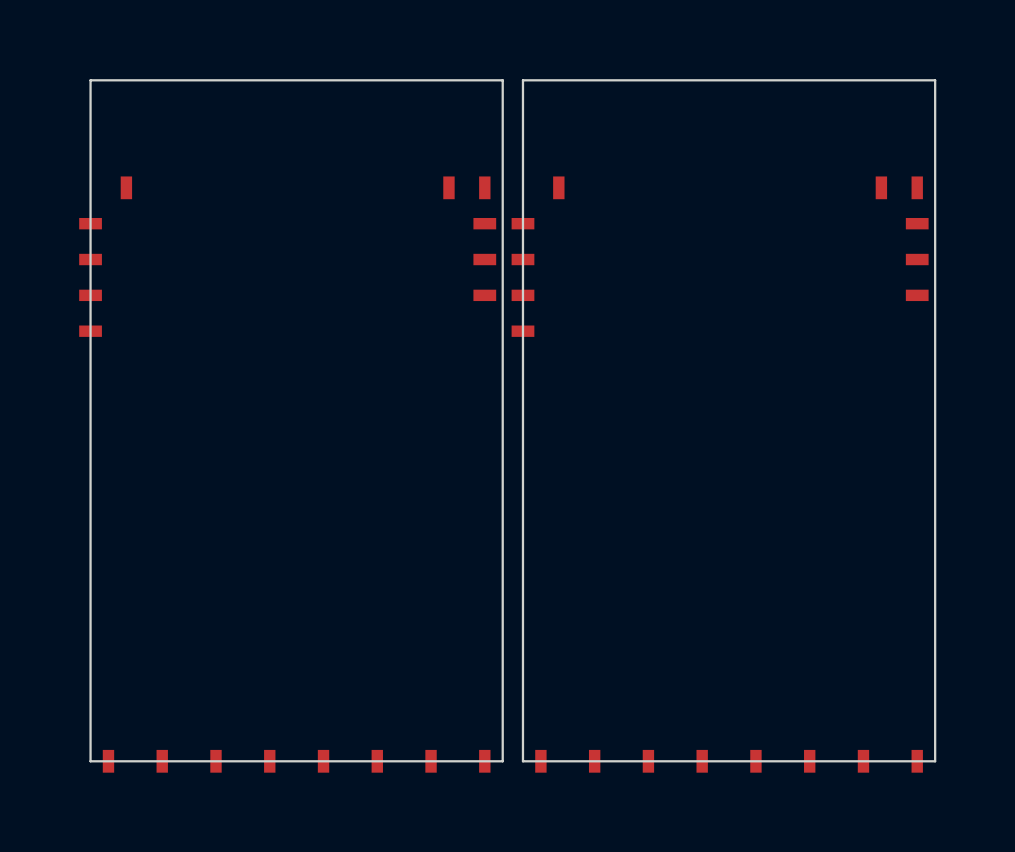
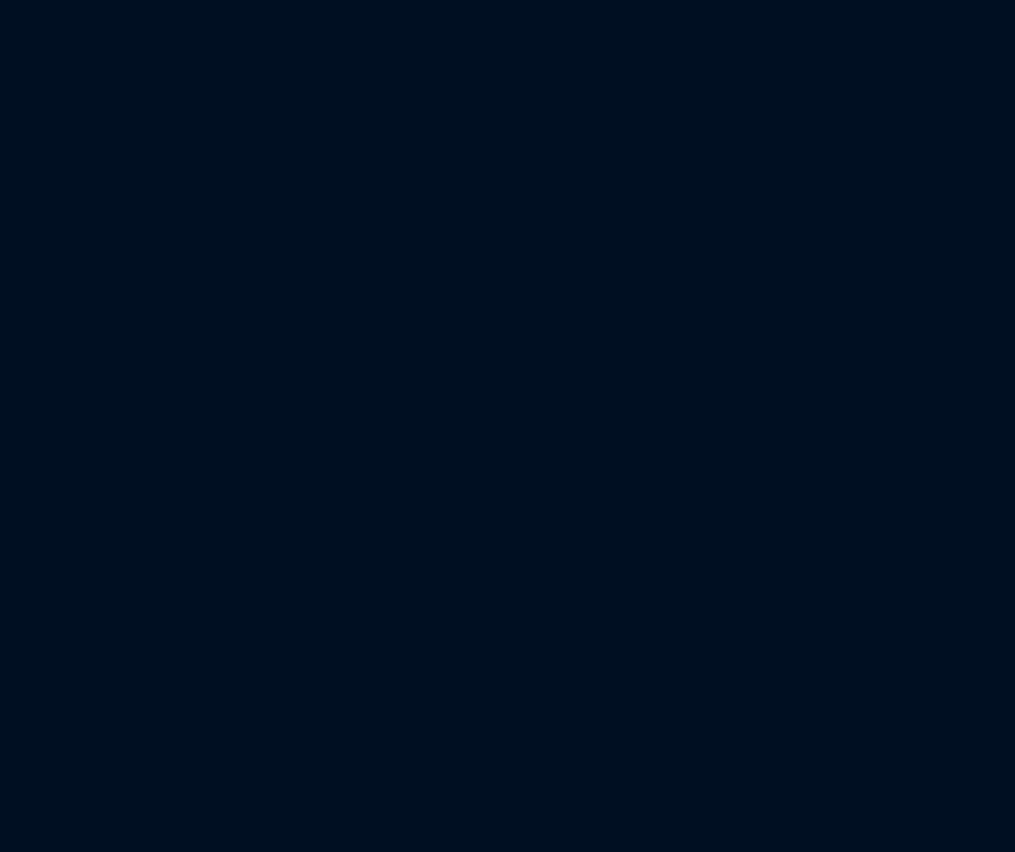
part: (291, 425) -> none
part: (723, 425) -> none

